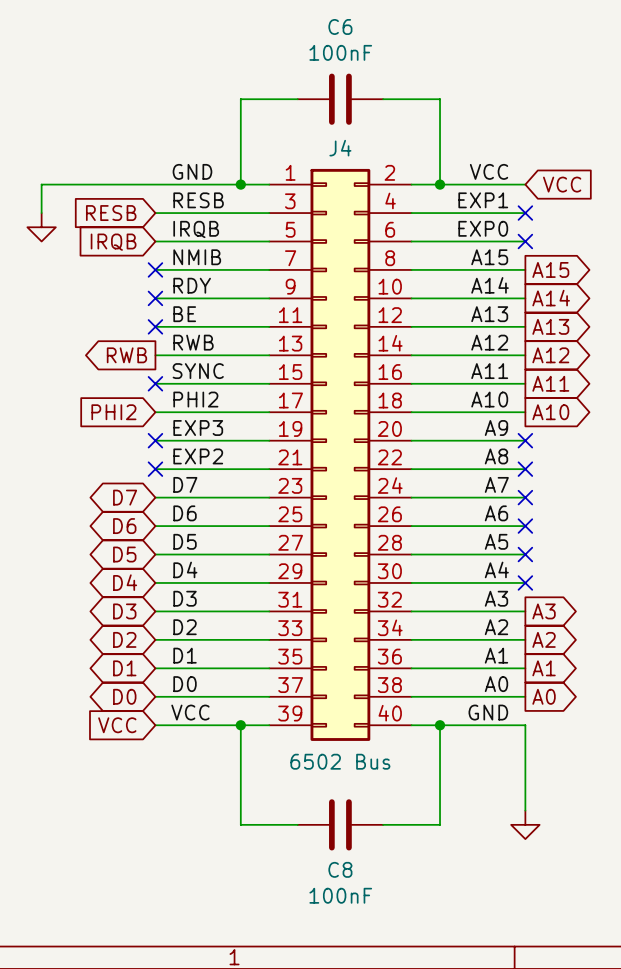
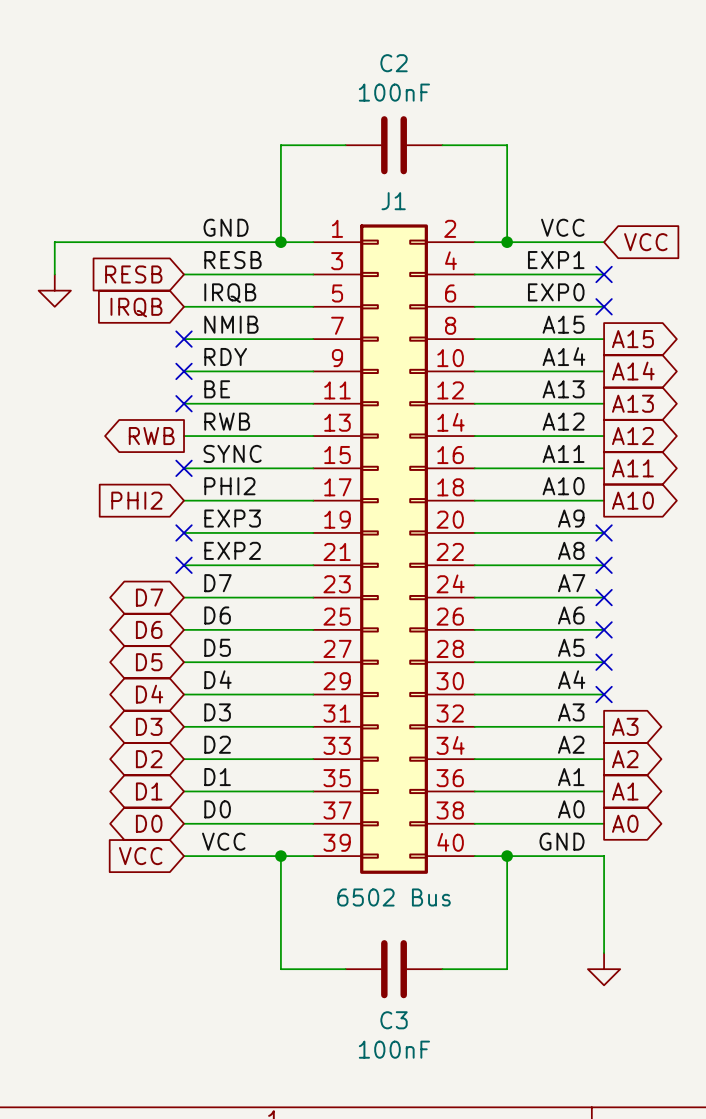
C6 name: C6 (340, 26) -> C2 (394, 63)
J4 name: J4 (340, 148) -> J1 (393, 201)
C8 name: C8 (340, 869) -> C3 (394, 1020)

